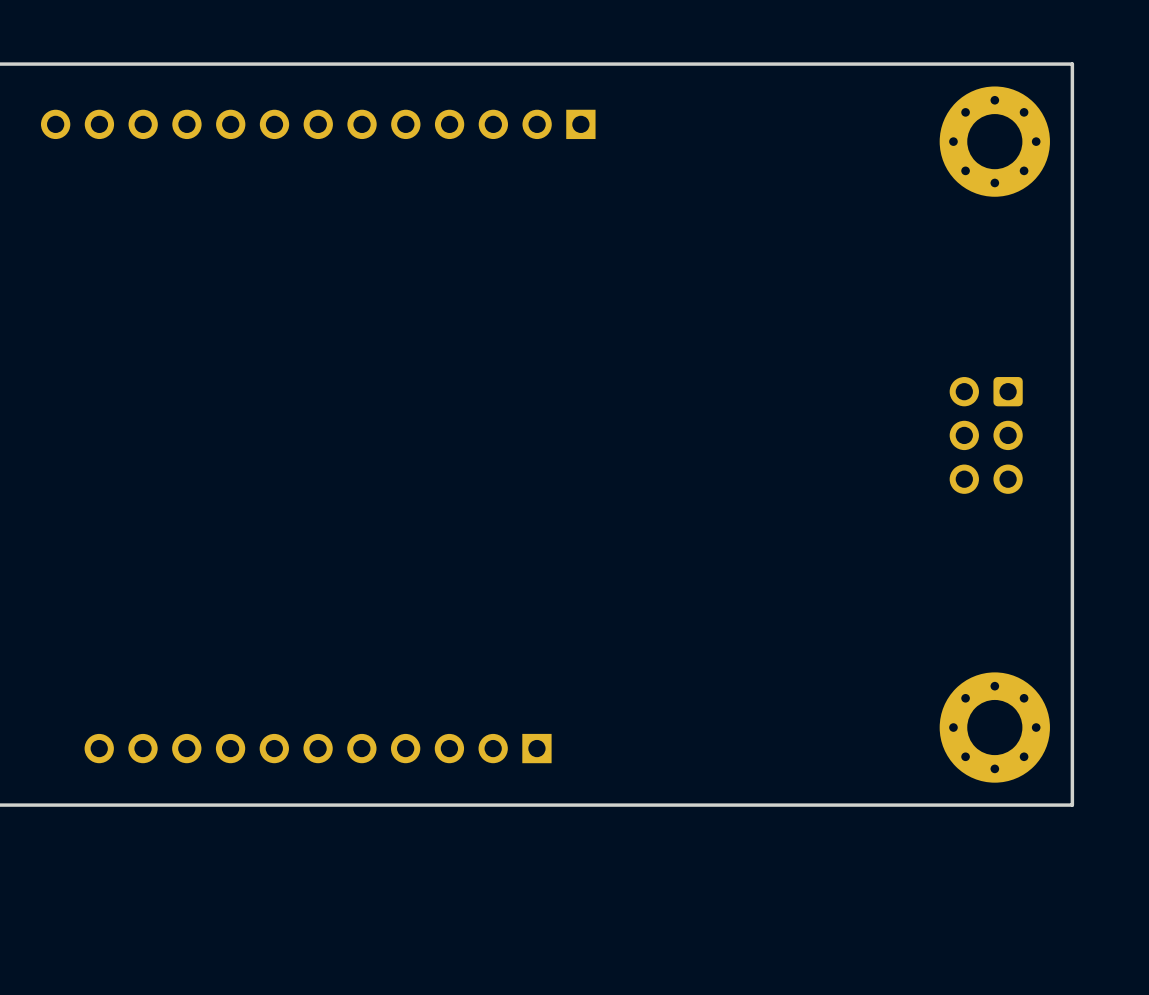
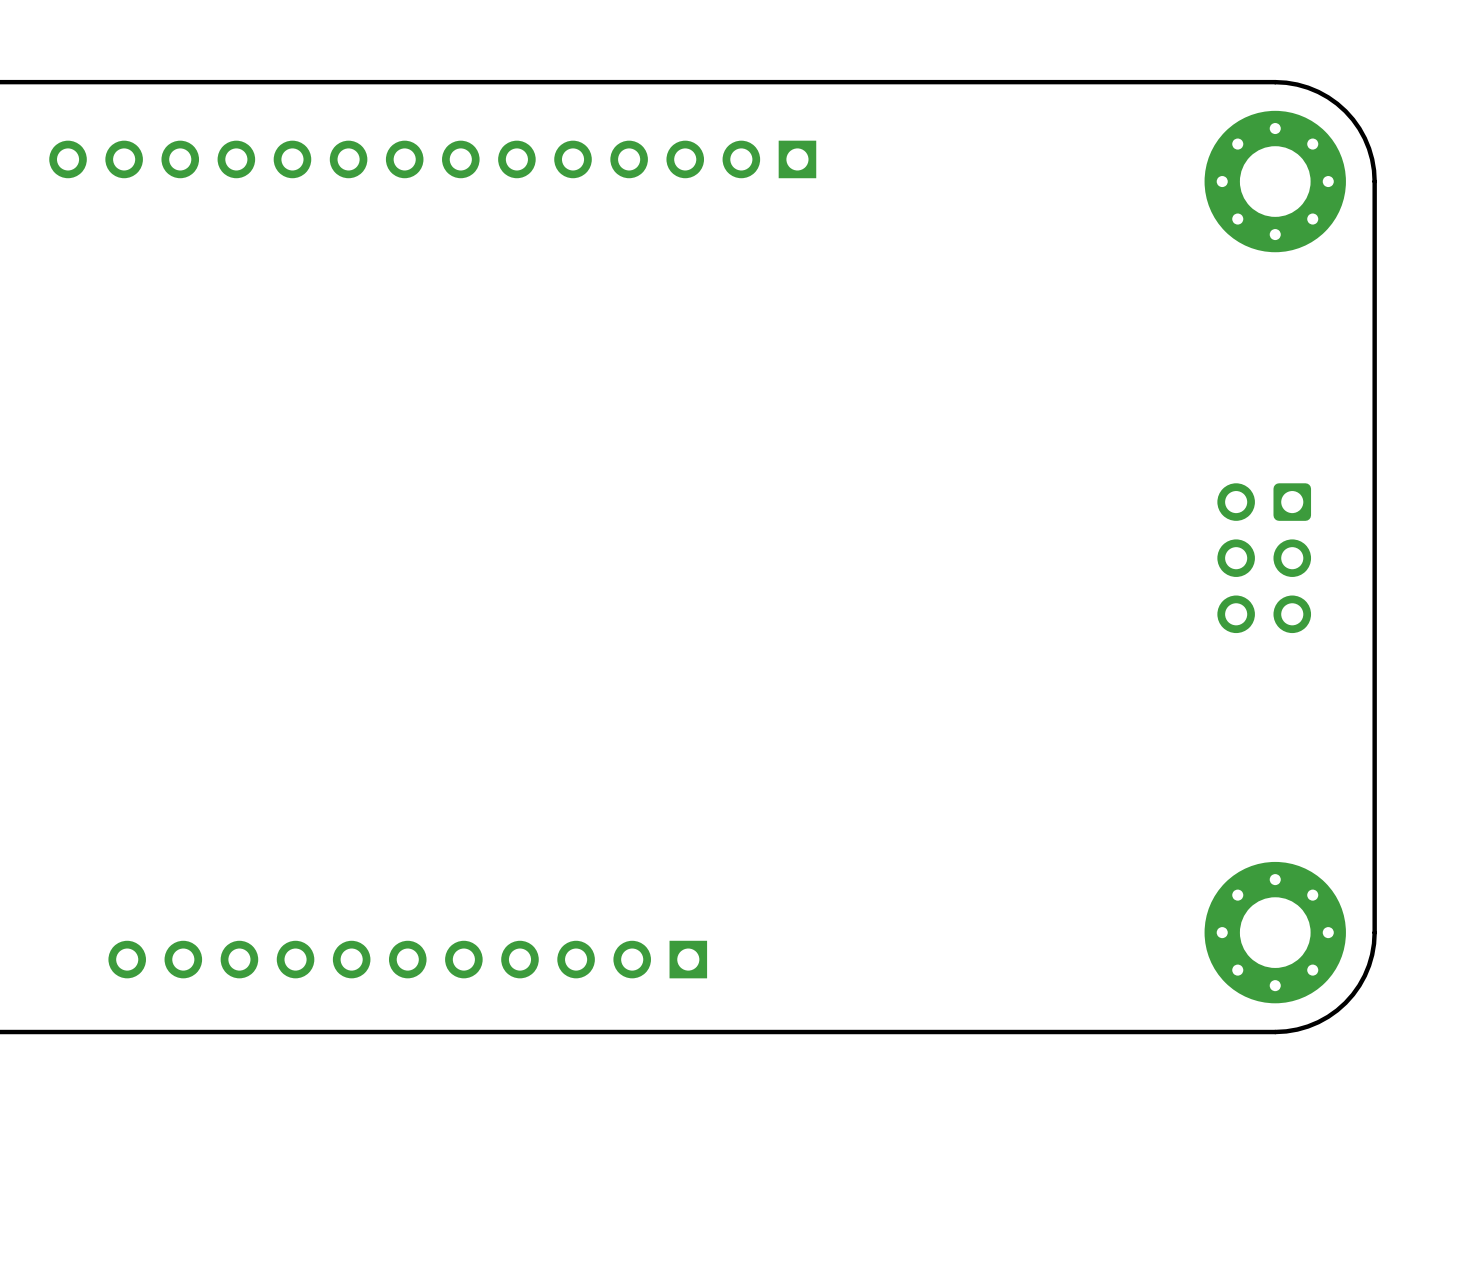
board edge: (994, 64) (1072, 64) (1072, 141) -> (1275, 82) (1308, 87) (1328, 97) (1345, 111) (1364, 138) (1372, 159) (1374, 181)
part: (318, 124) -> none
part: none -> (432, 159)
board edge: (1072, 727) (1072, 805) (994, 805) -> (1374, 932) (1372, 954) (1364, 975) (1345, 1002) (1318, 1022) (1297, 1029) (1275, 1032)

